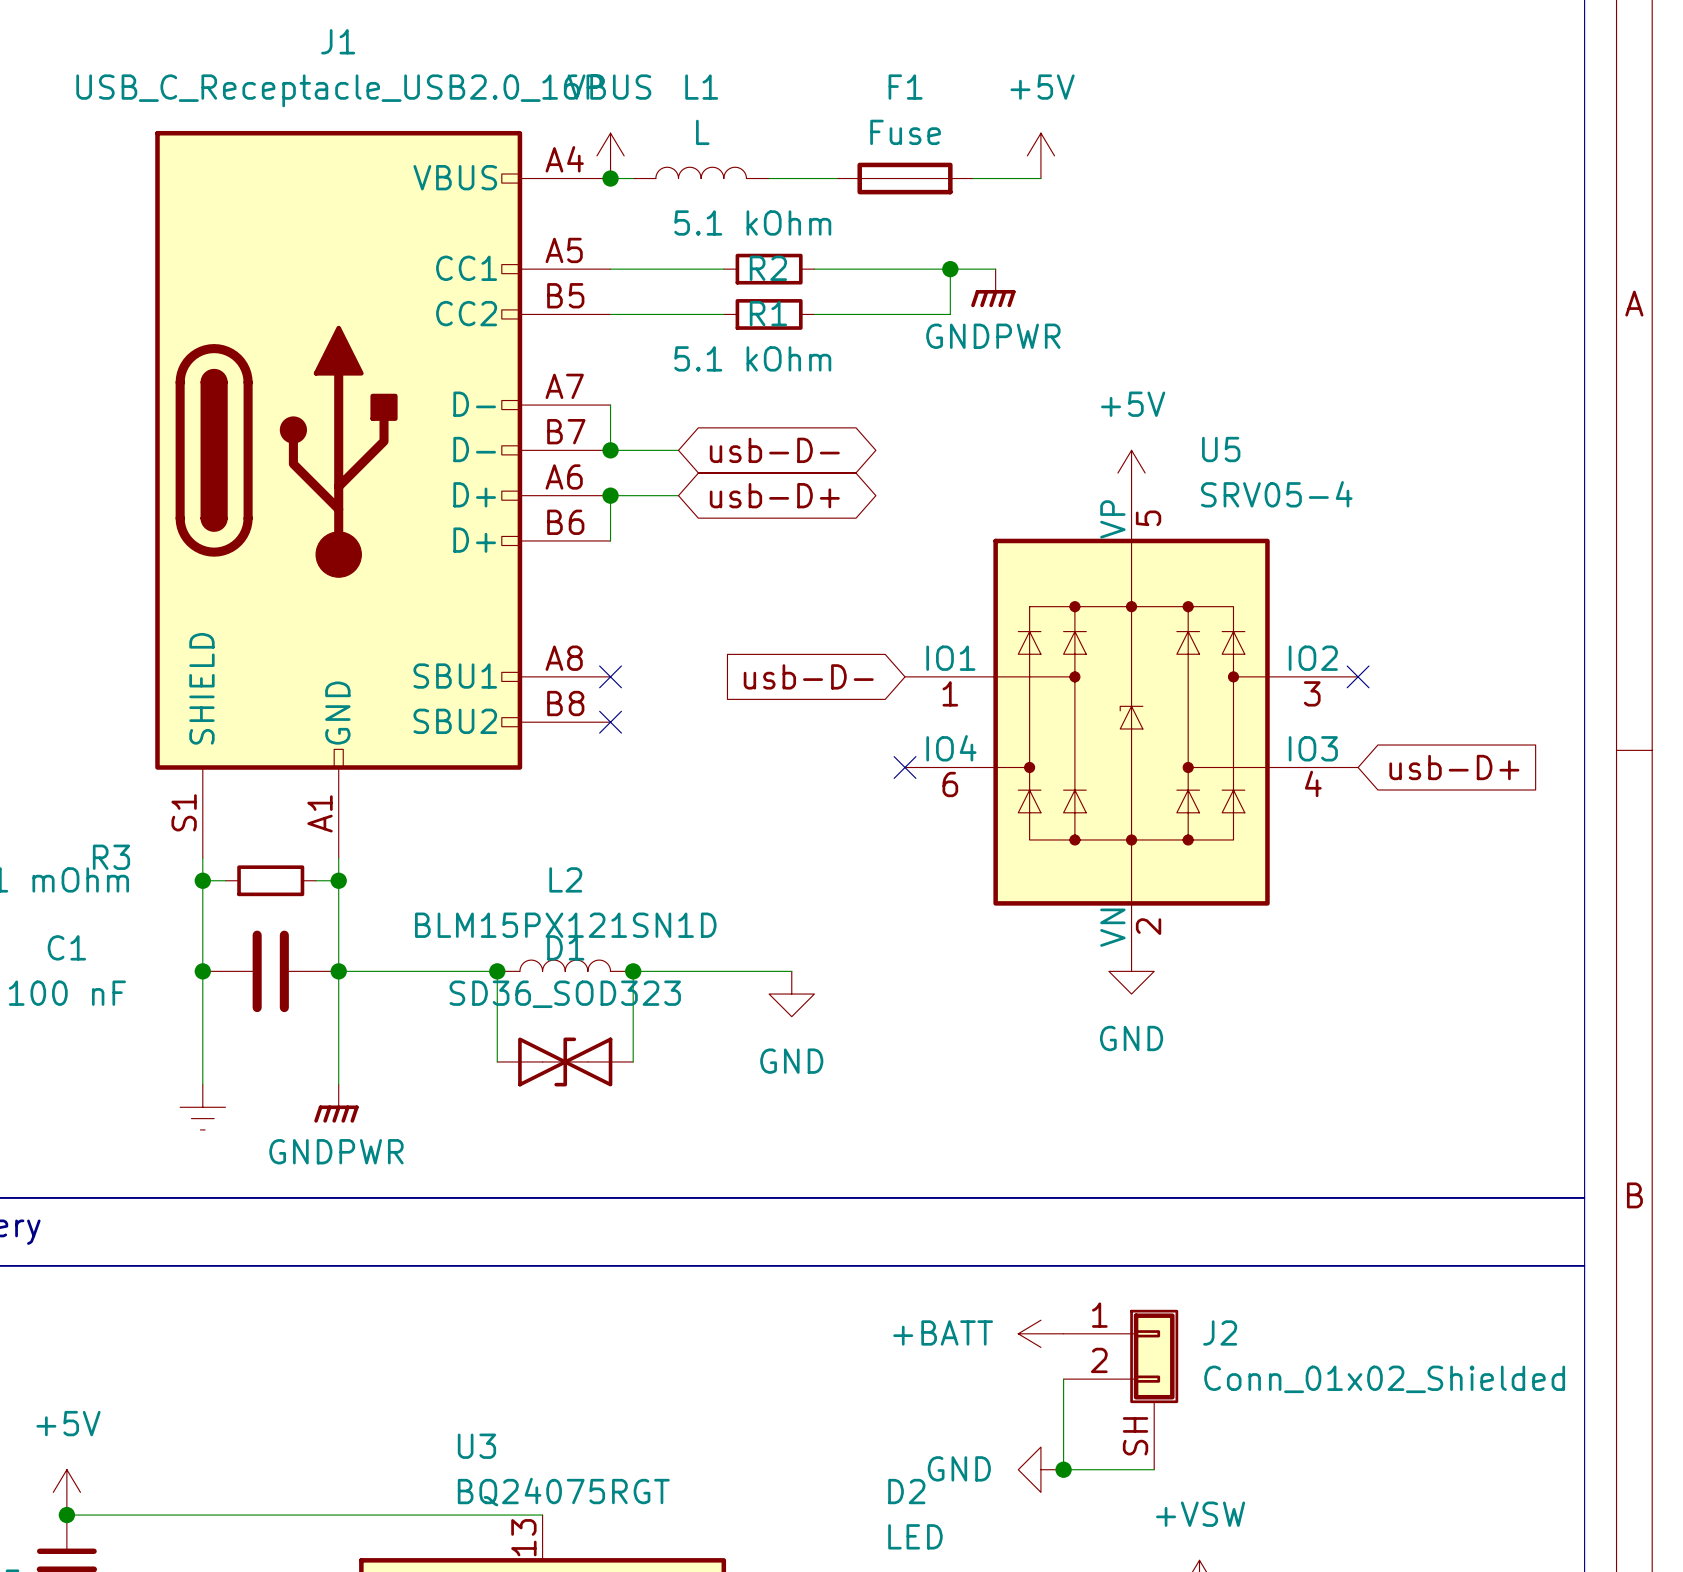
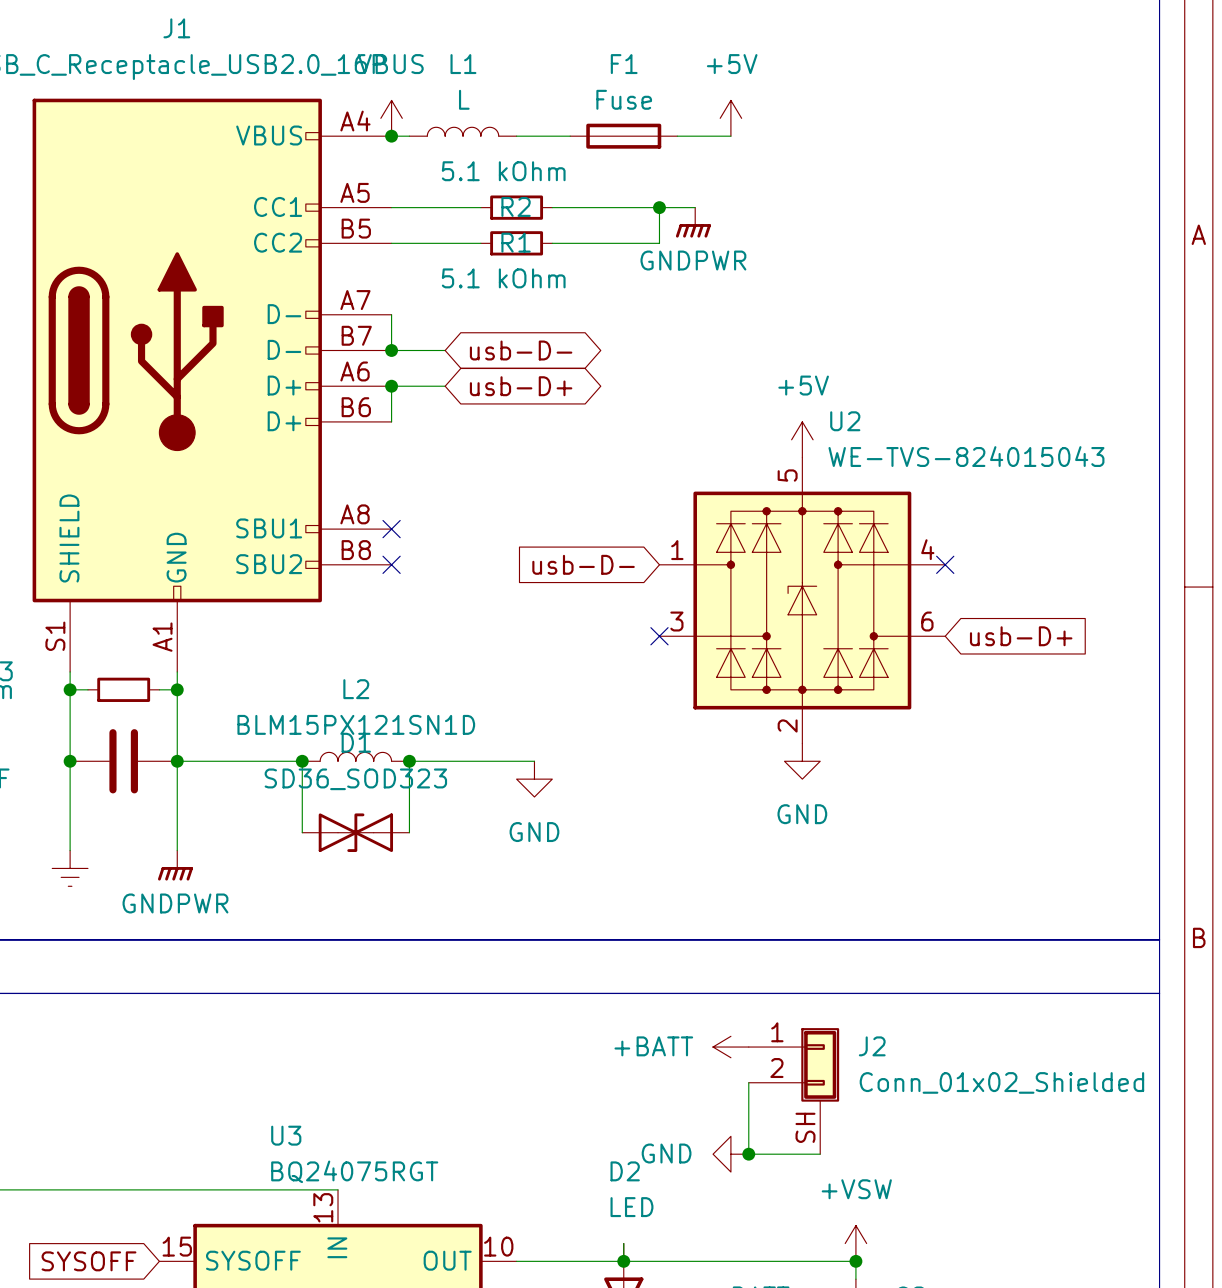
power symbol position: +5V (1131, 473) -> +5V (802, 439)
global label position: usb-D- (808, 676) -> usb-D- (583, 564)
no-connect mark position: (1358, 676) -> (945, 564)
U5: SRV05-4 (1131, 722) -> none
no-connect mark position: (905, 767) -> (659, 636)
U2: none -> WE-TVS-824015043 (802, 600)
global label position: usb-D+ (1454, 767) -> usb-D+ (1021, 636)

